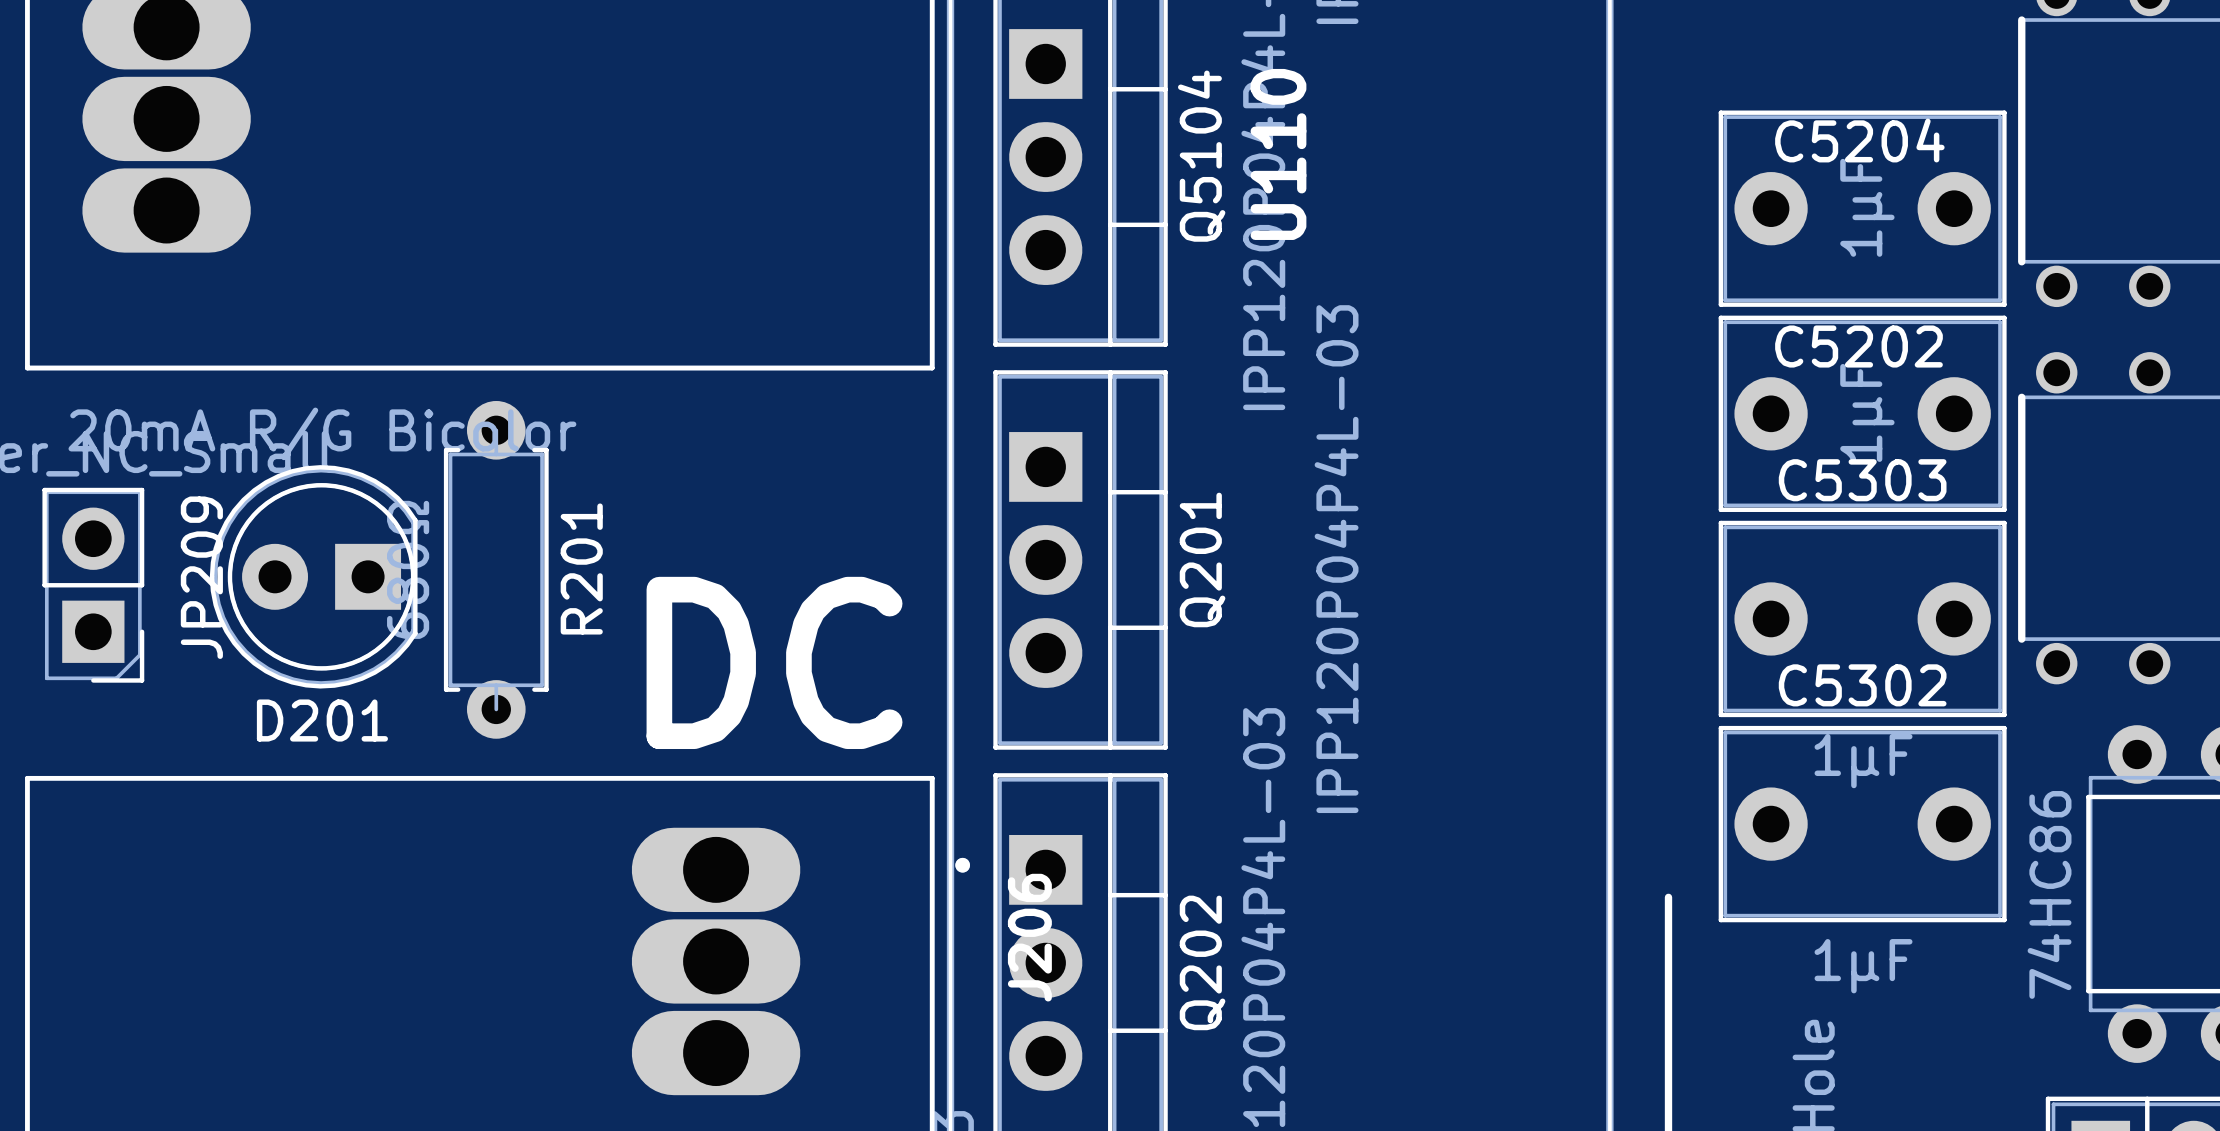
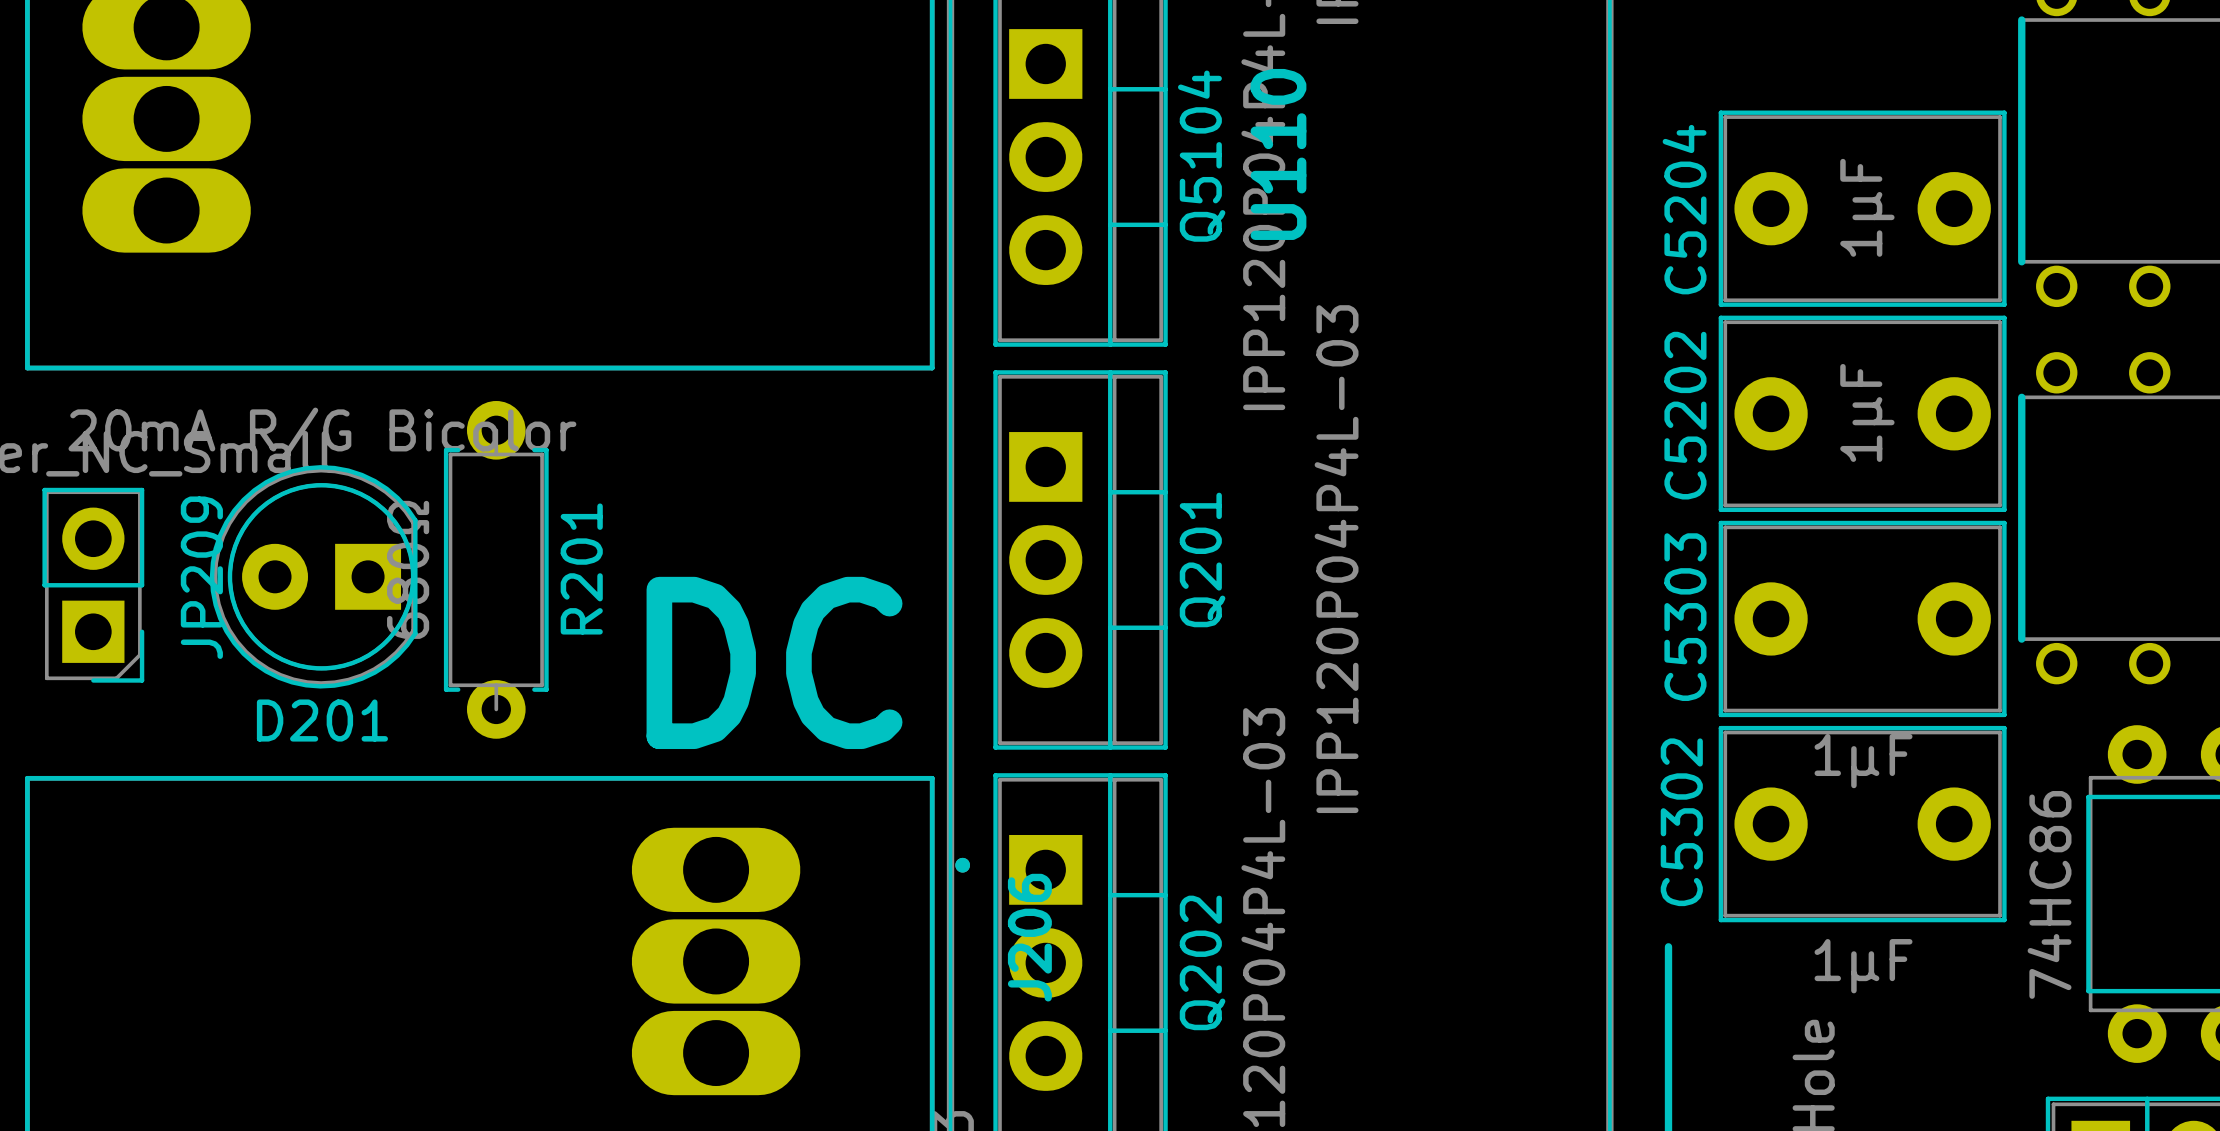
C5204 name rotation: 0° (1859, 140) -> 90° counterclockwise (1684, 209)
C5202 name rotation: 0° (1858, 346) -> 90° counterclockwise (1685, 415)
C5303 name rotation: 0° (1862, 480) -> 90° counterclockwise (1685, 617)
C5303 name position: C5303 (1862, 480) -> C5303 (1685, 617)
C5302 name rotation: 0° (1862, 685) -> 90° counterclockwise (1681, 822)
C5302 name position: C5302 (1862, 685) -> C5302 (1681, 822)
line: (1668, 897) (1668, 946) -> none

